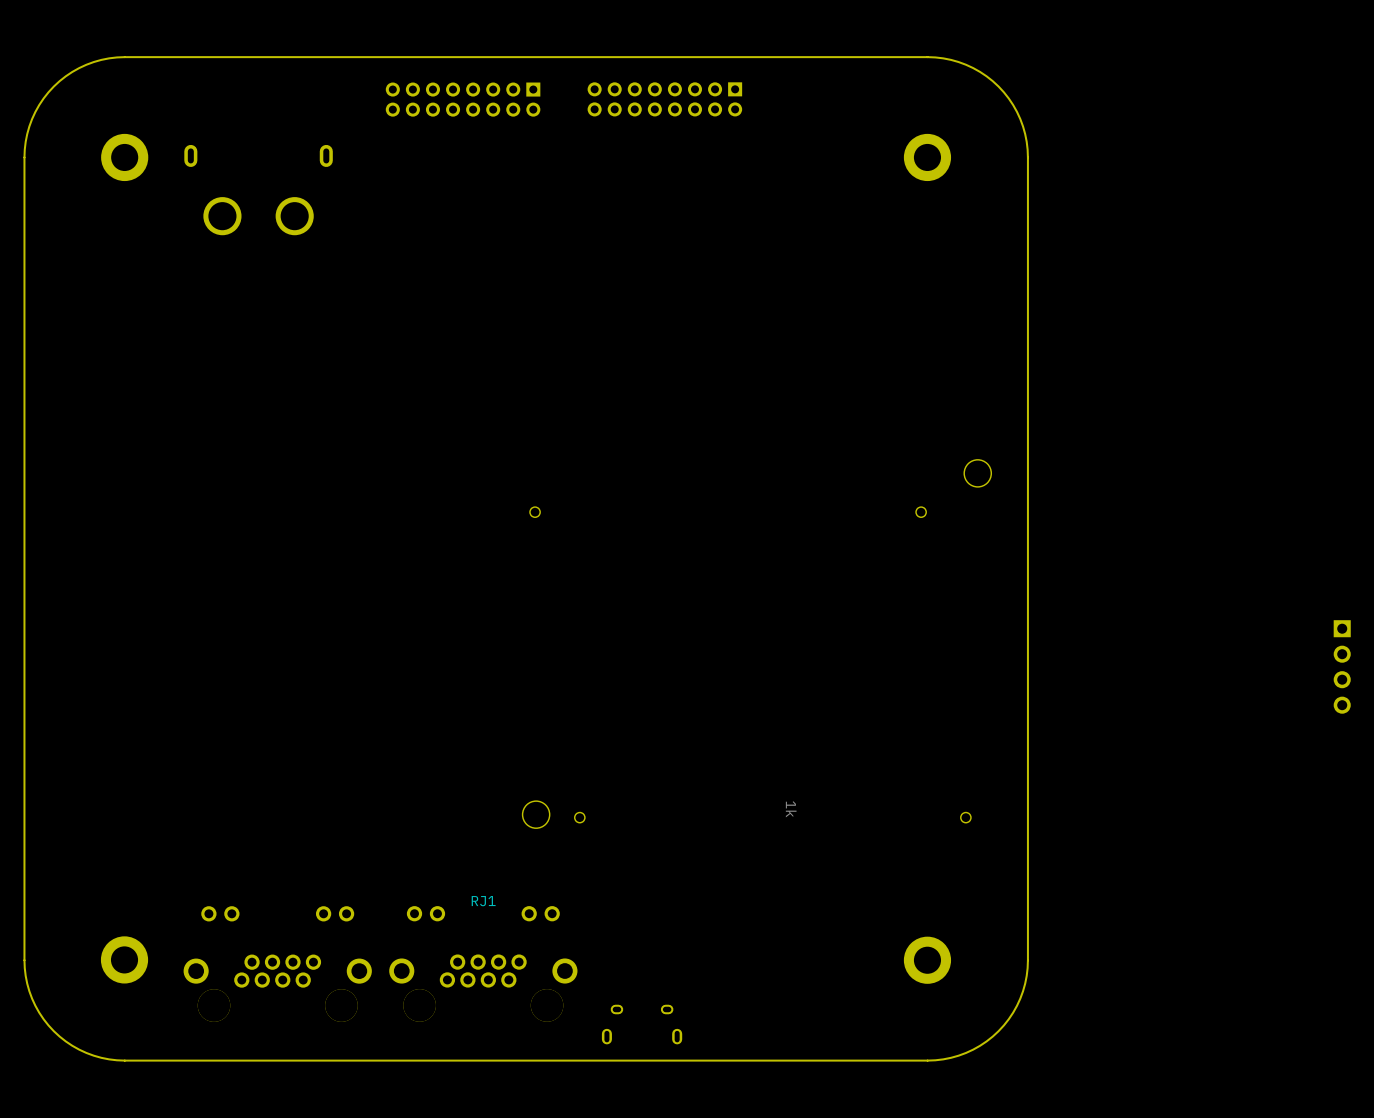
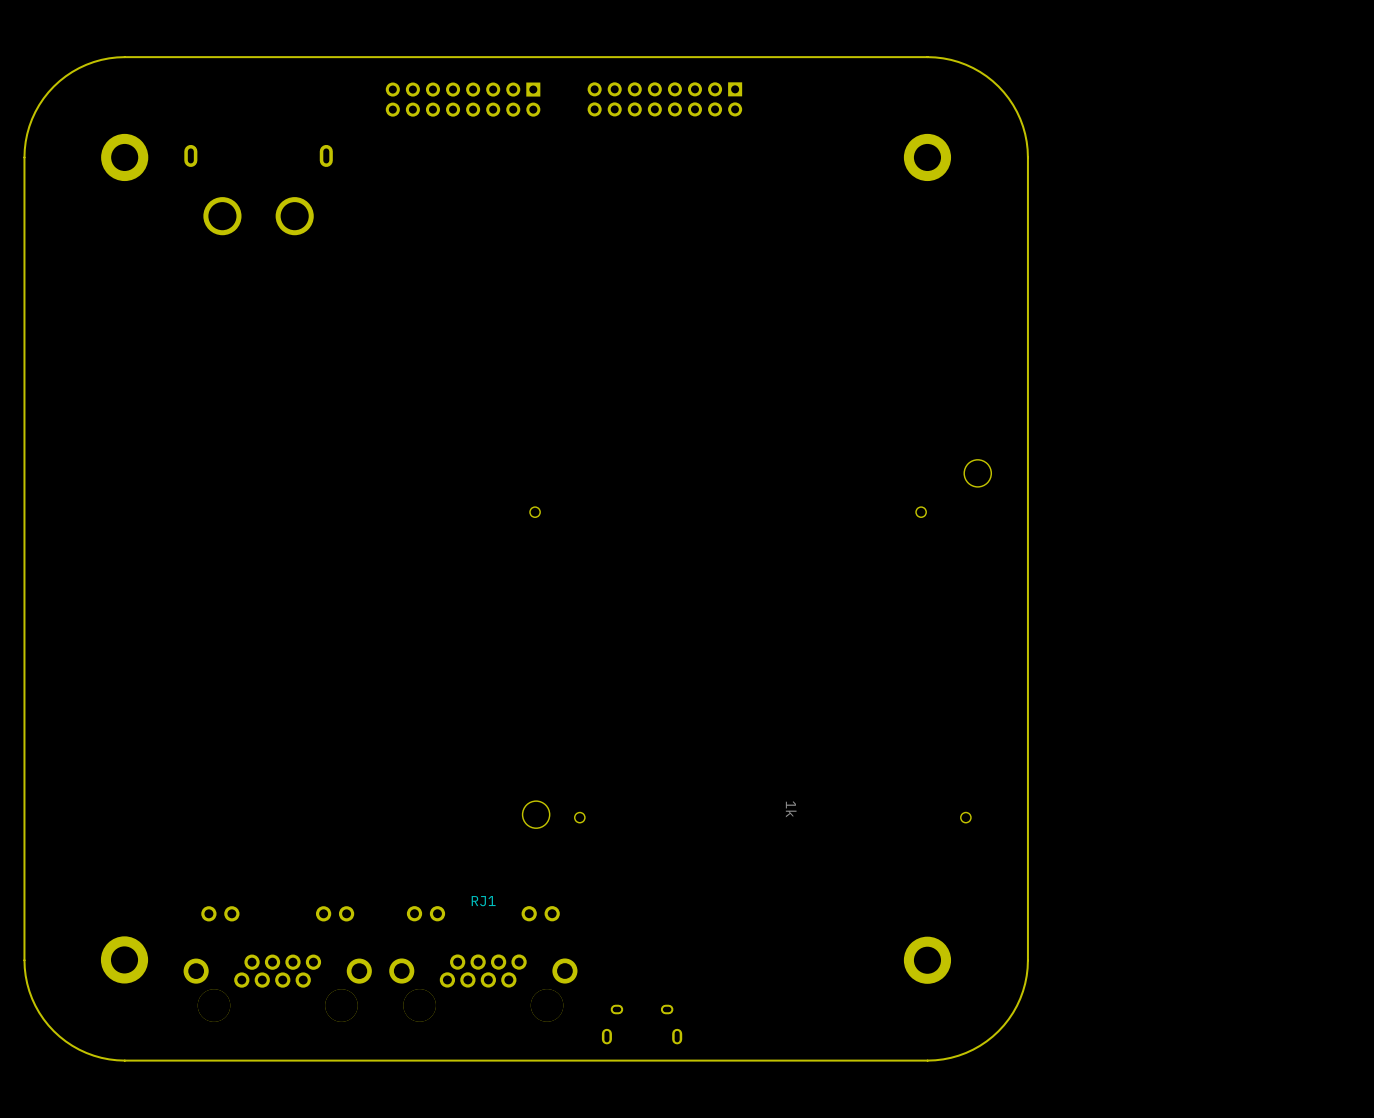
part: (1342, 666) -> none

